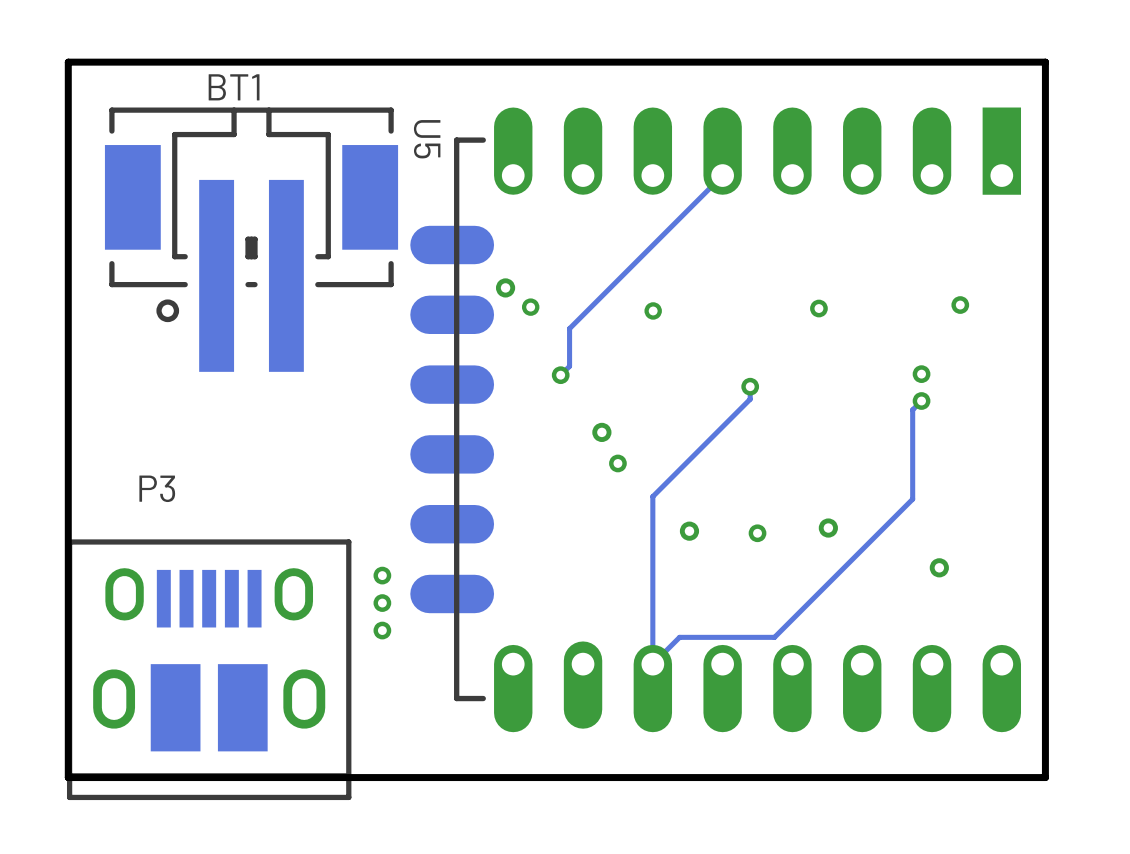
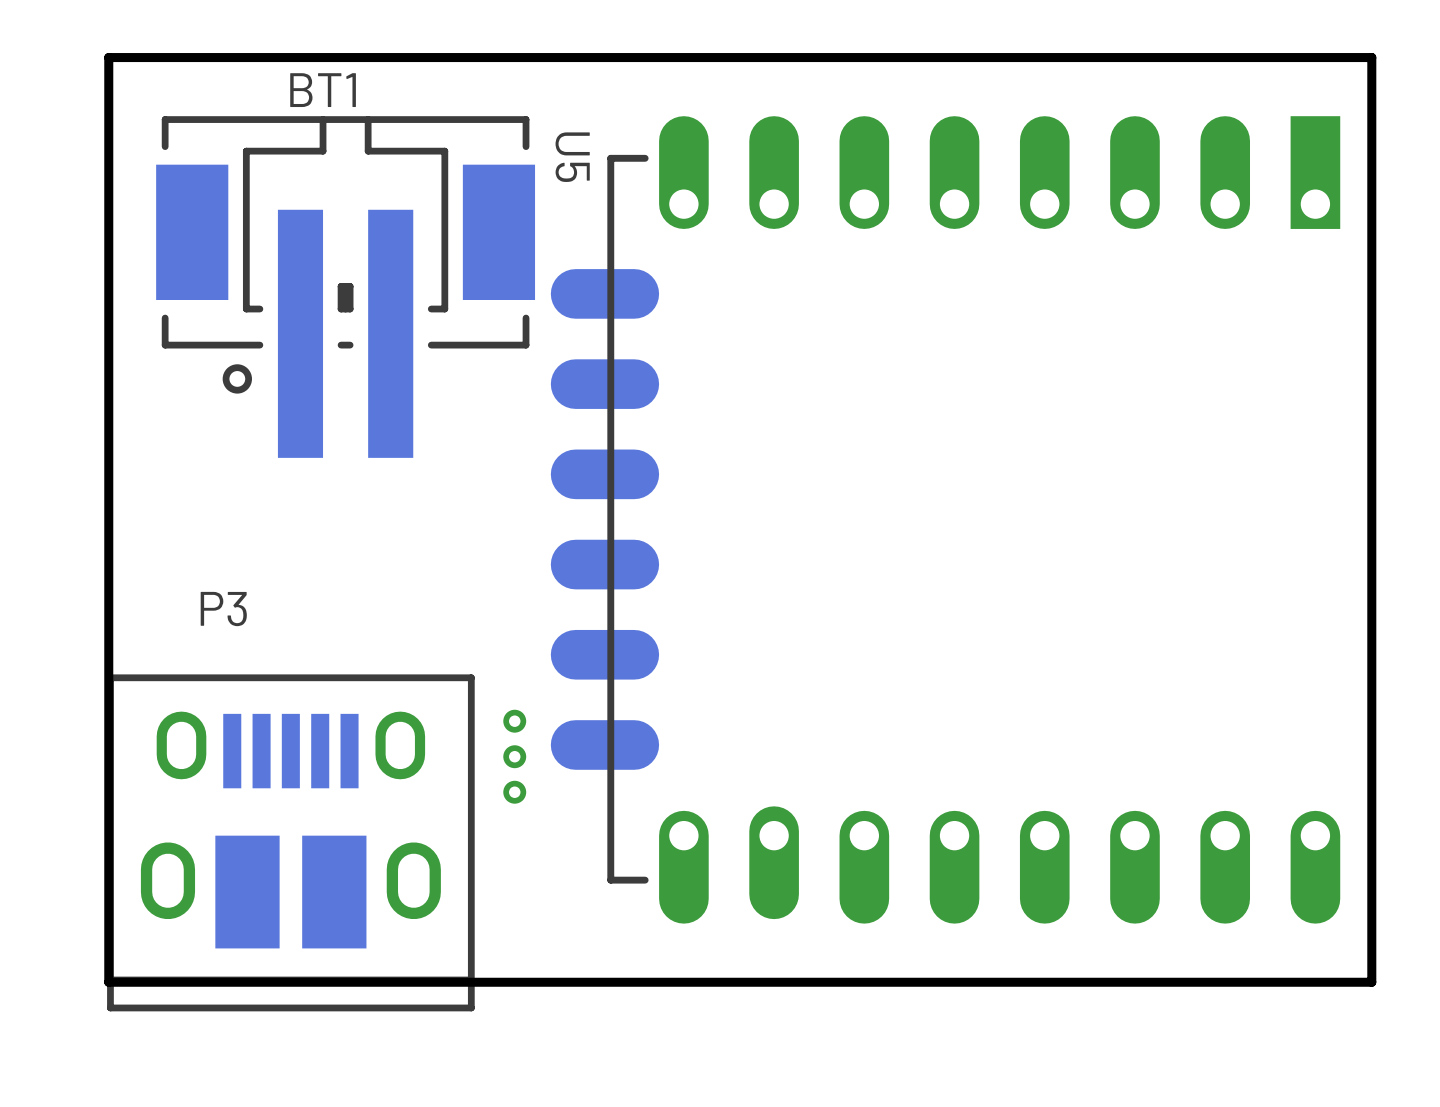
track: (722, 175) (569, 328) (569, 366) (560, 375) -> none
via: (505, 287) -> none
via: (960, 305) -> none
via: (530, 307) -> none
via: (818, 308) -> none
via: (653, 310) -> none
via: (921, 374) -> none
via: (560, 375) -> none
track: (750, 386) (750, 399) (652, 496) (652, 664) (679, 637) (774, 637) (912, 499) (912, 409) (921, 401) -> none
via: (750, 386) -> none
via: (921, 401) -> none
via: (601, 432) -> none
via: (617, 463) -> none
via: (828, 528) -> none
via: (689, 531) -> none
via: (757, 533) -> none
via: (939, 567) -> none

